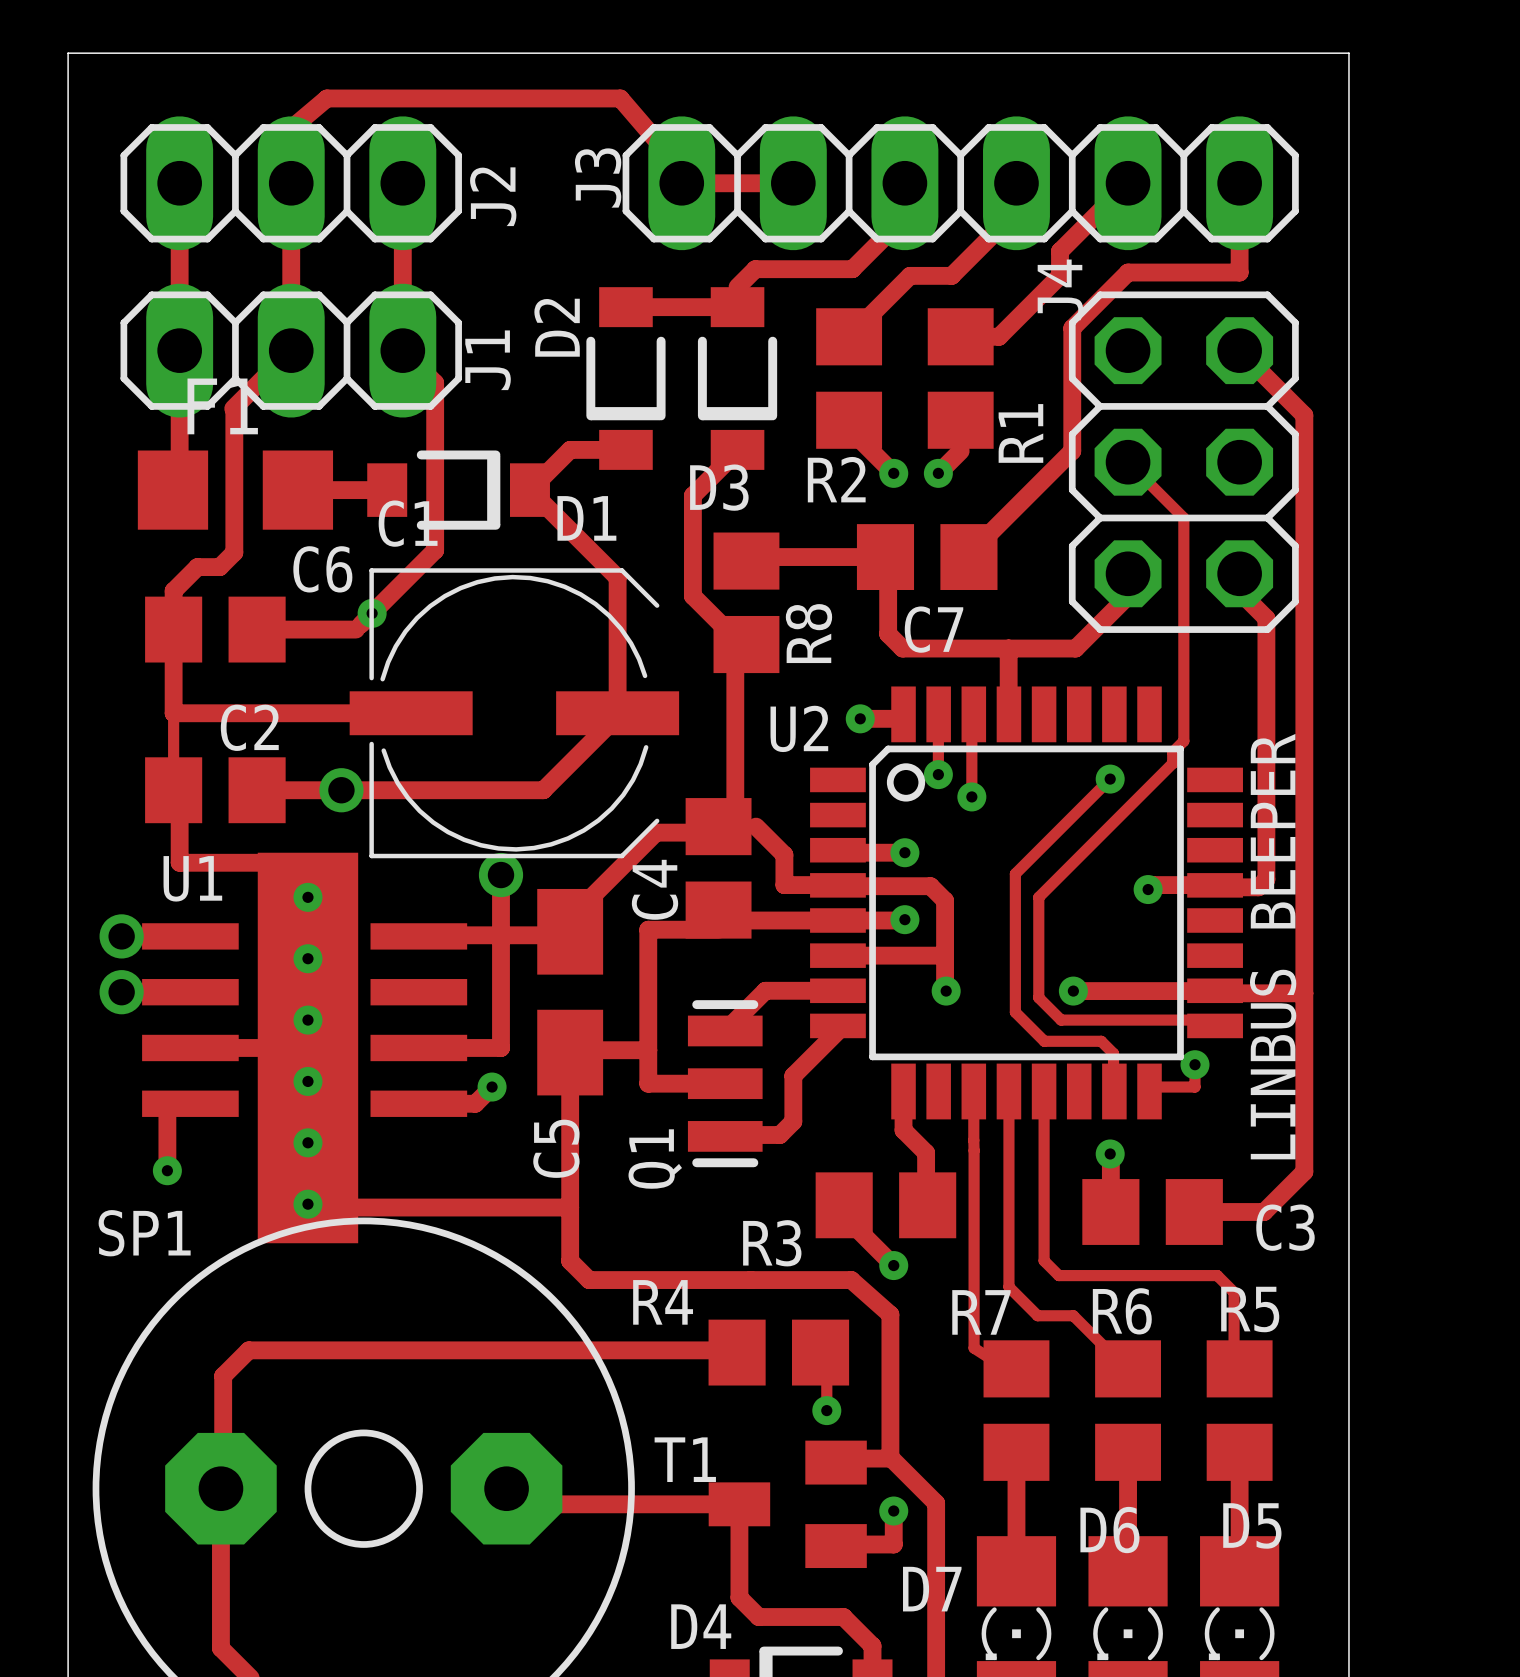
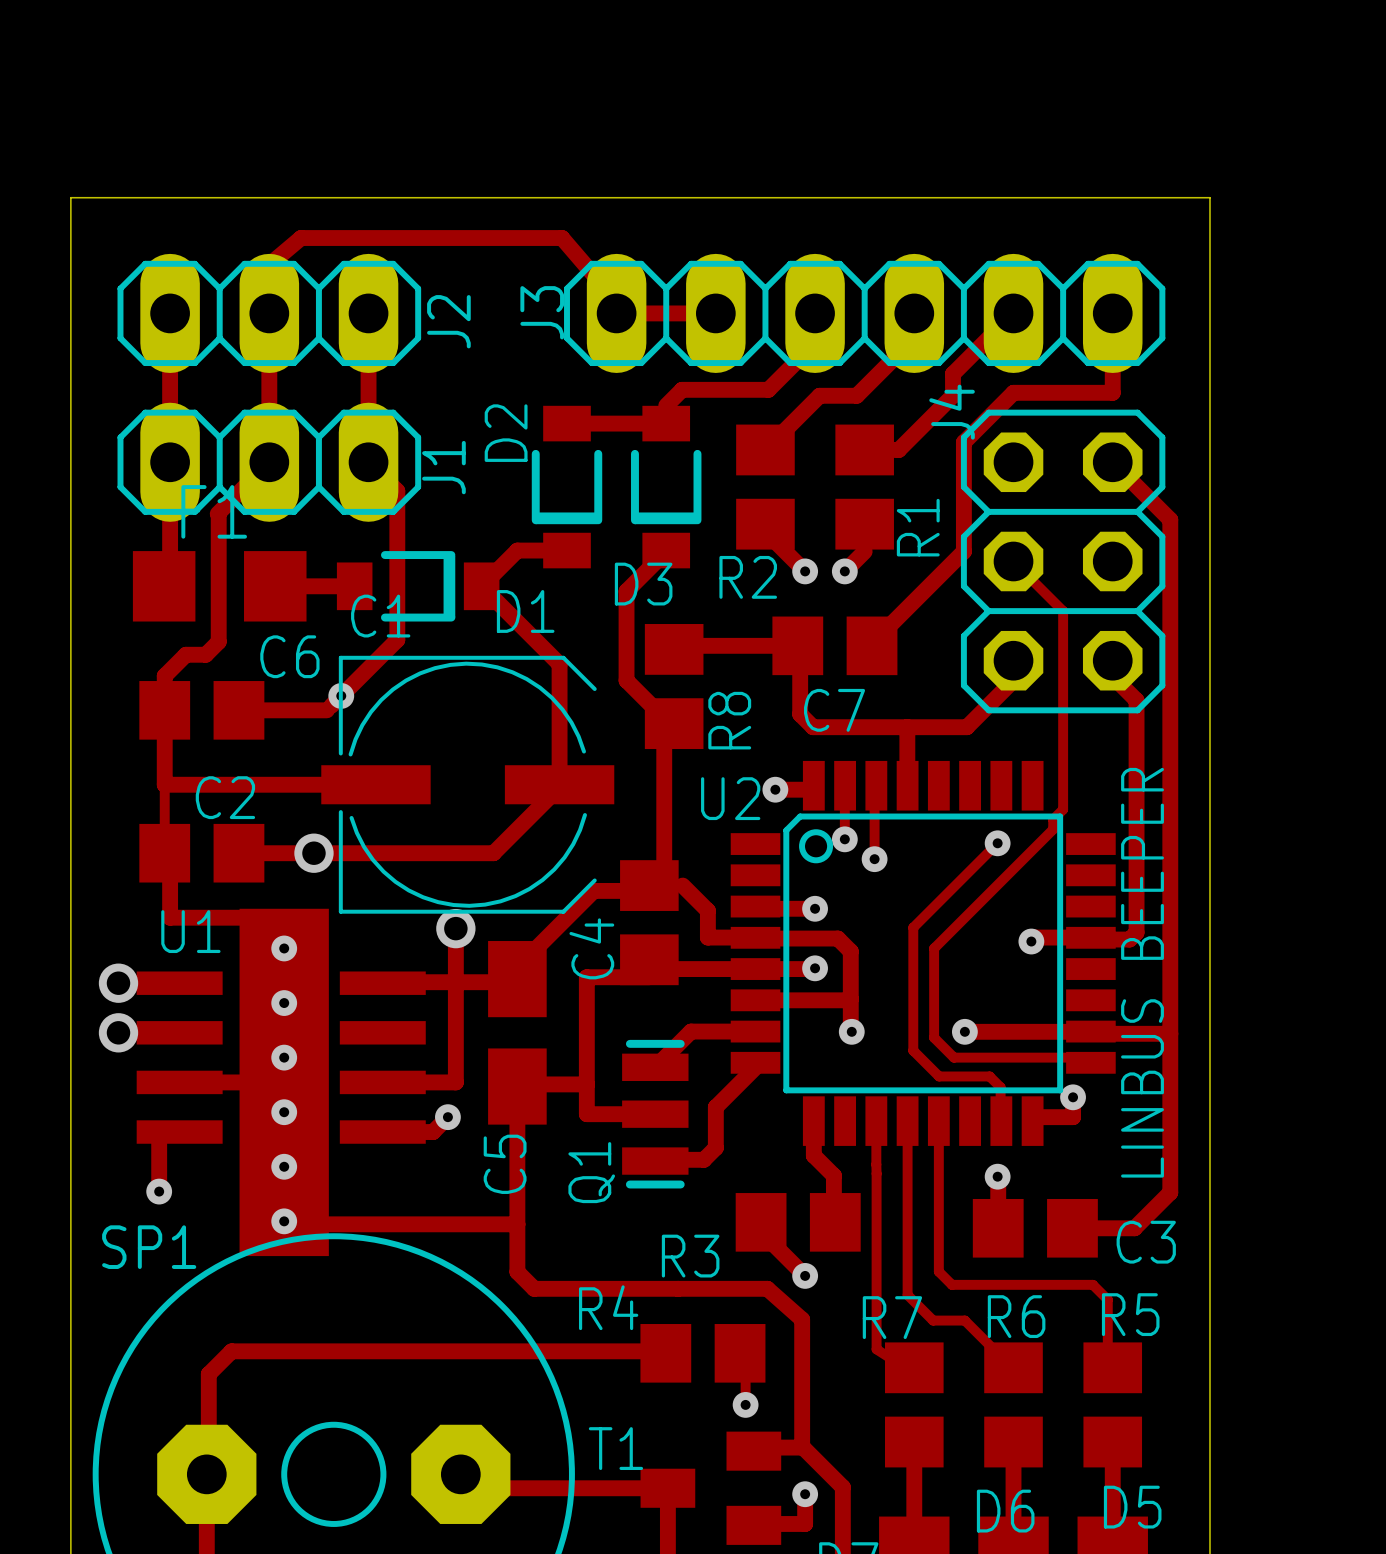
track width: thin (1195, 1064) (1195, 1087) (1150, 1087) -> thick (1073, 1097) (1073, 1117) (1033, 1117)

